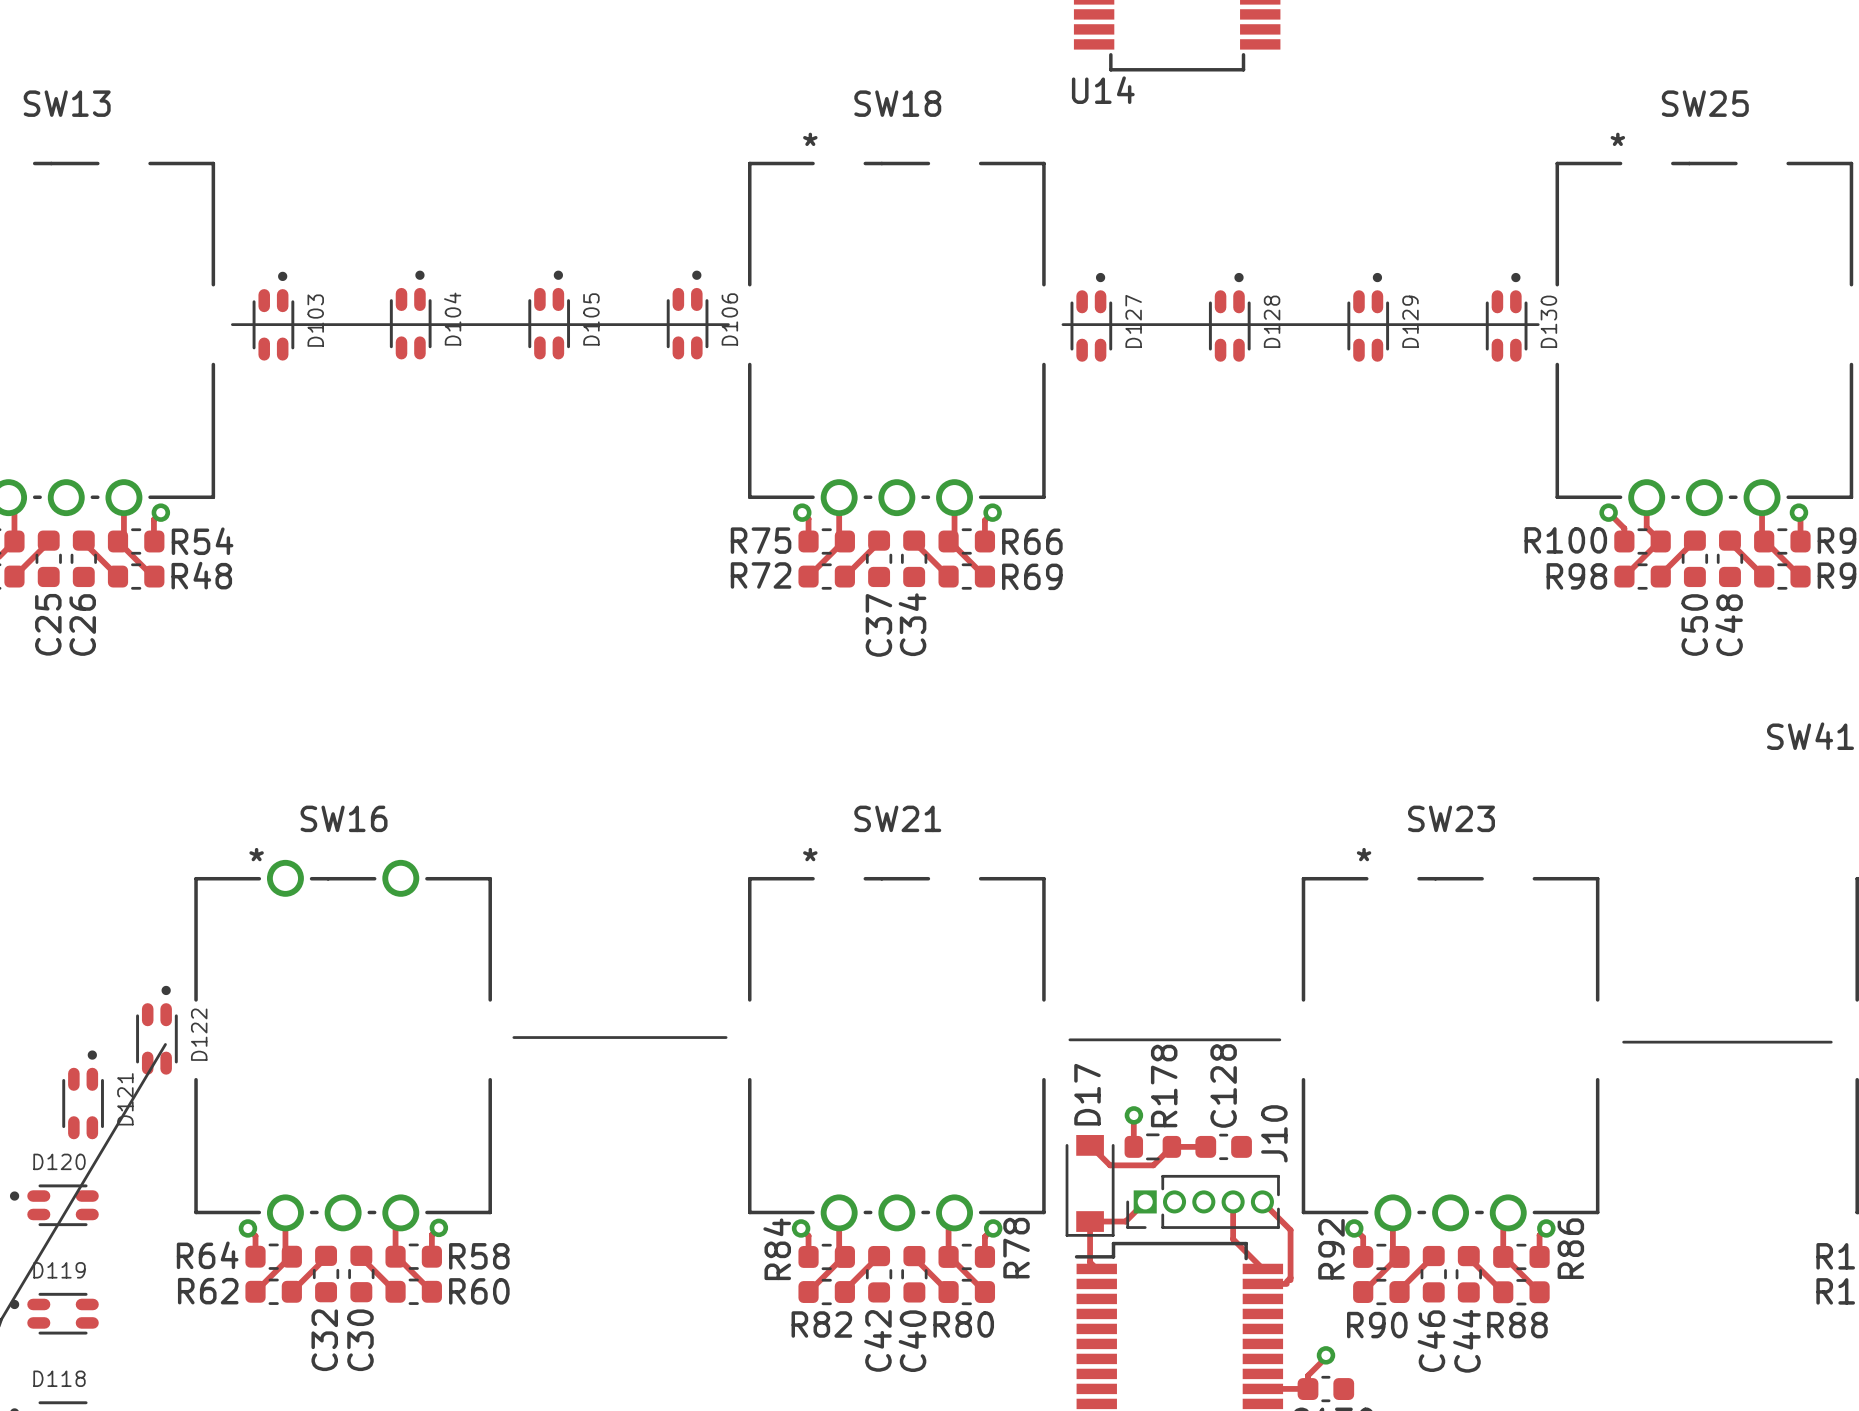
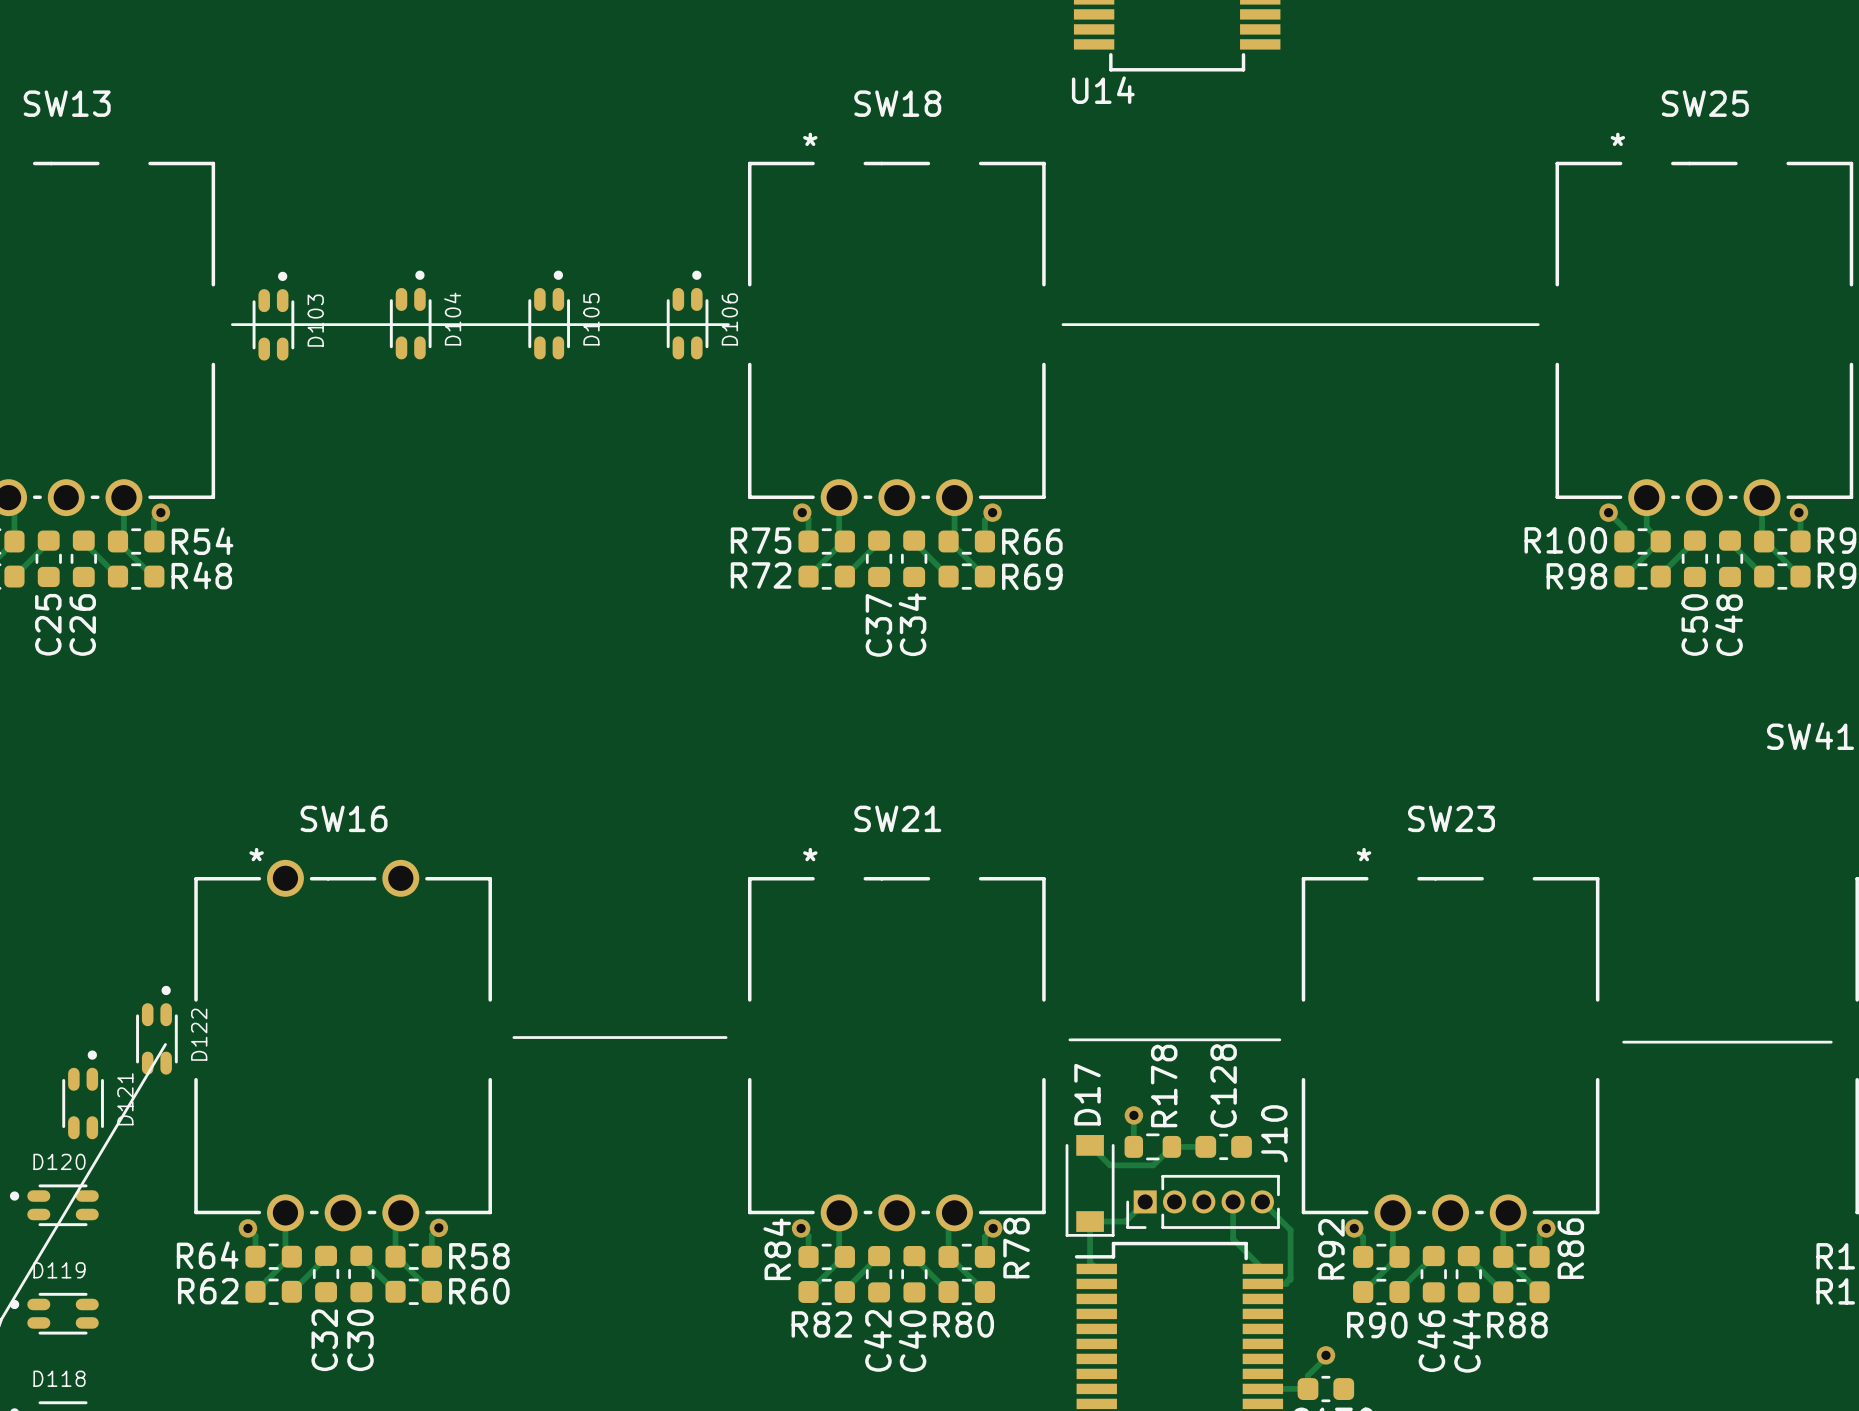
D127: (1091, 317) -> none
D128: (1229, 317) -> none
D129: (1368, 317) -> none
D130: (1506, 317) -> none

